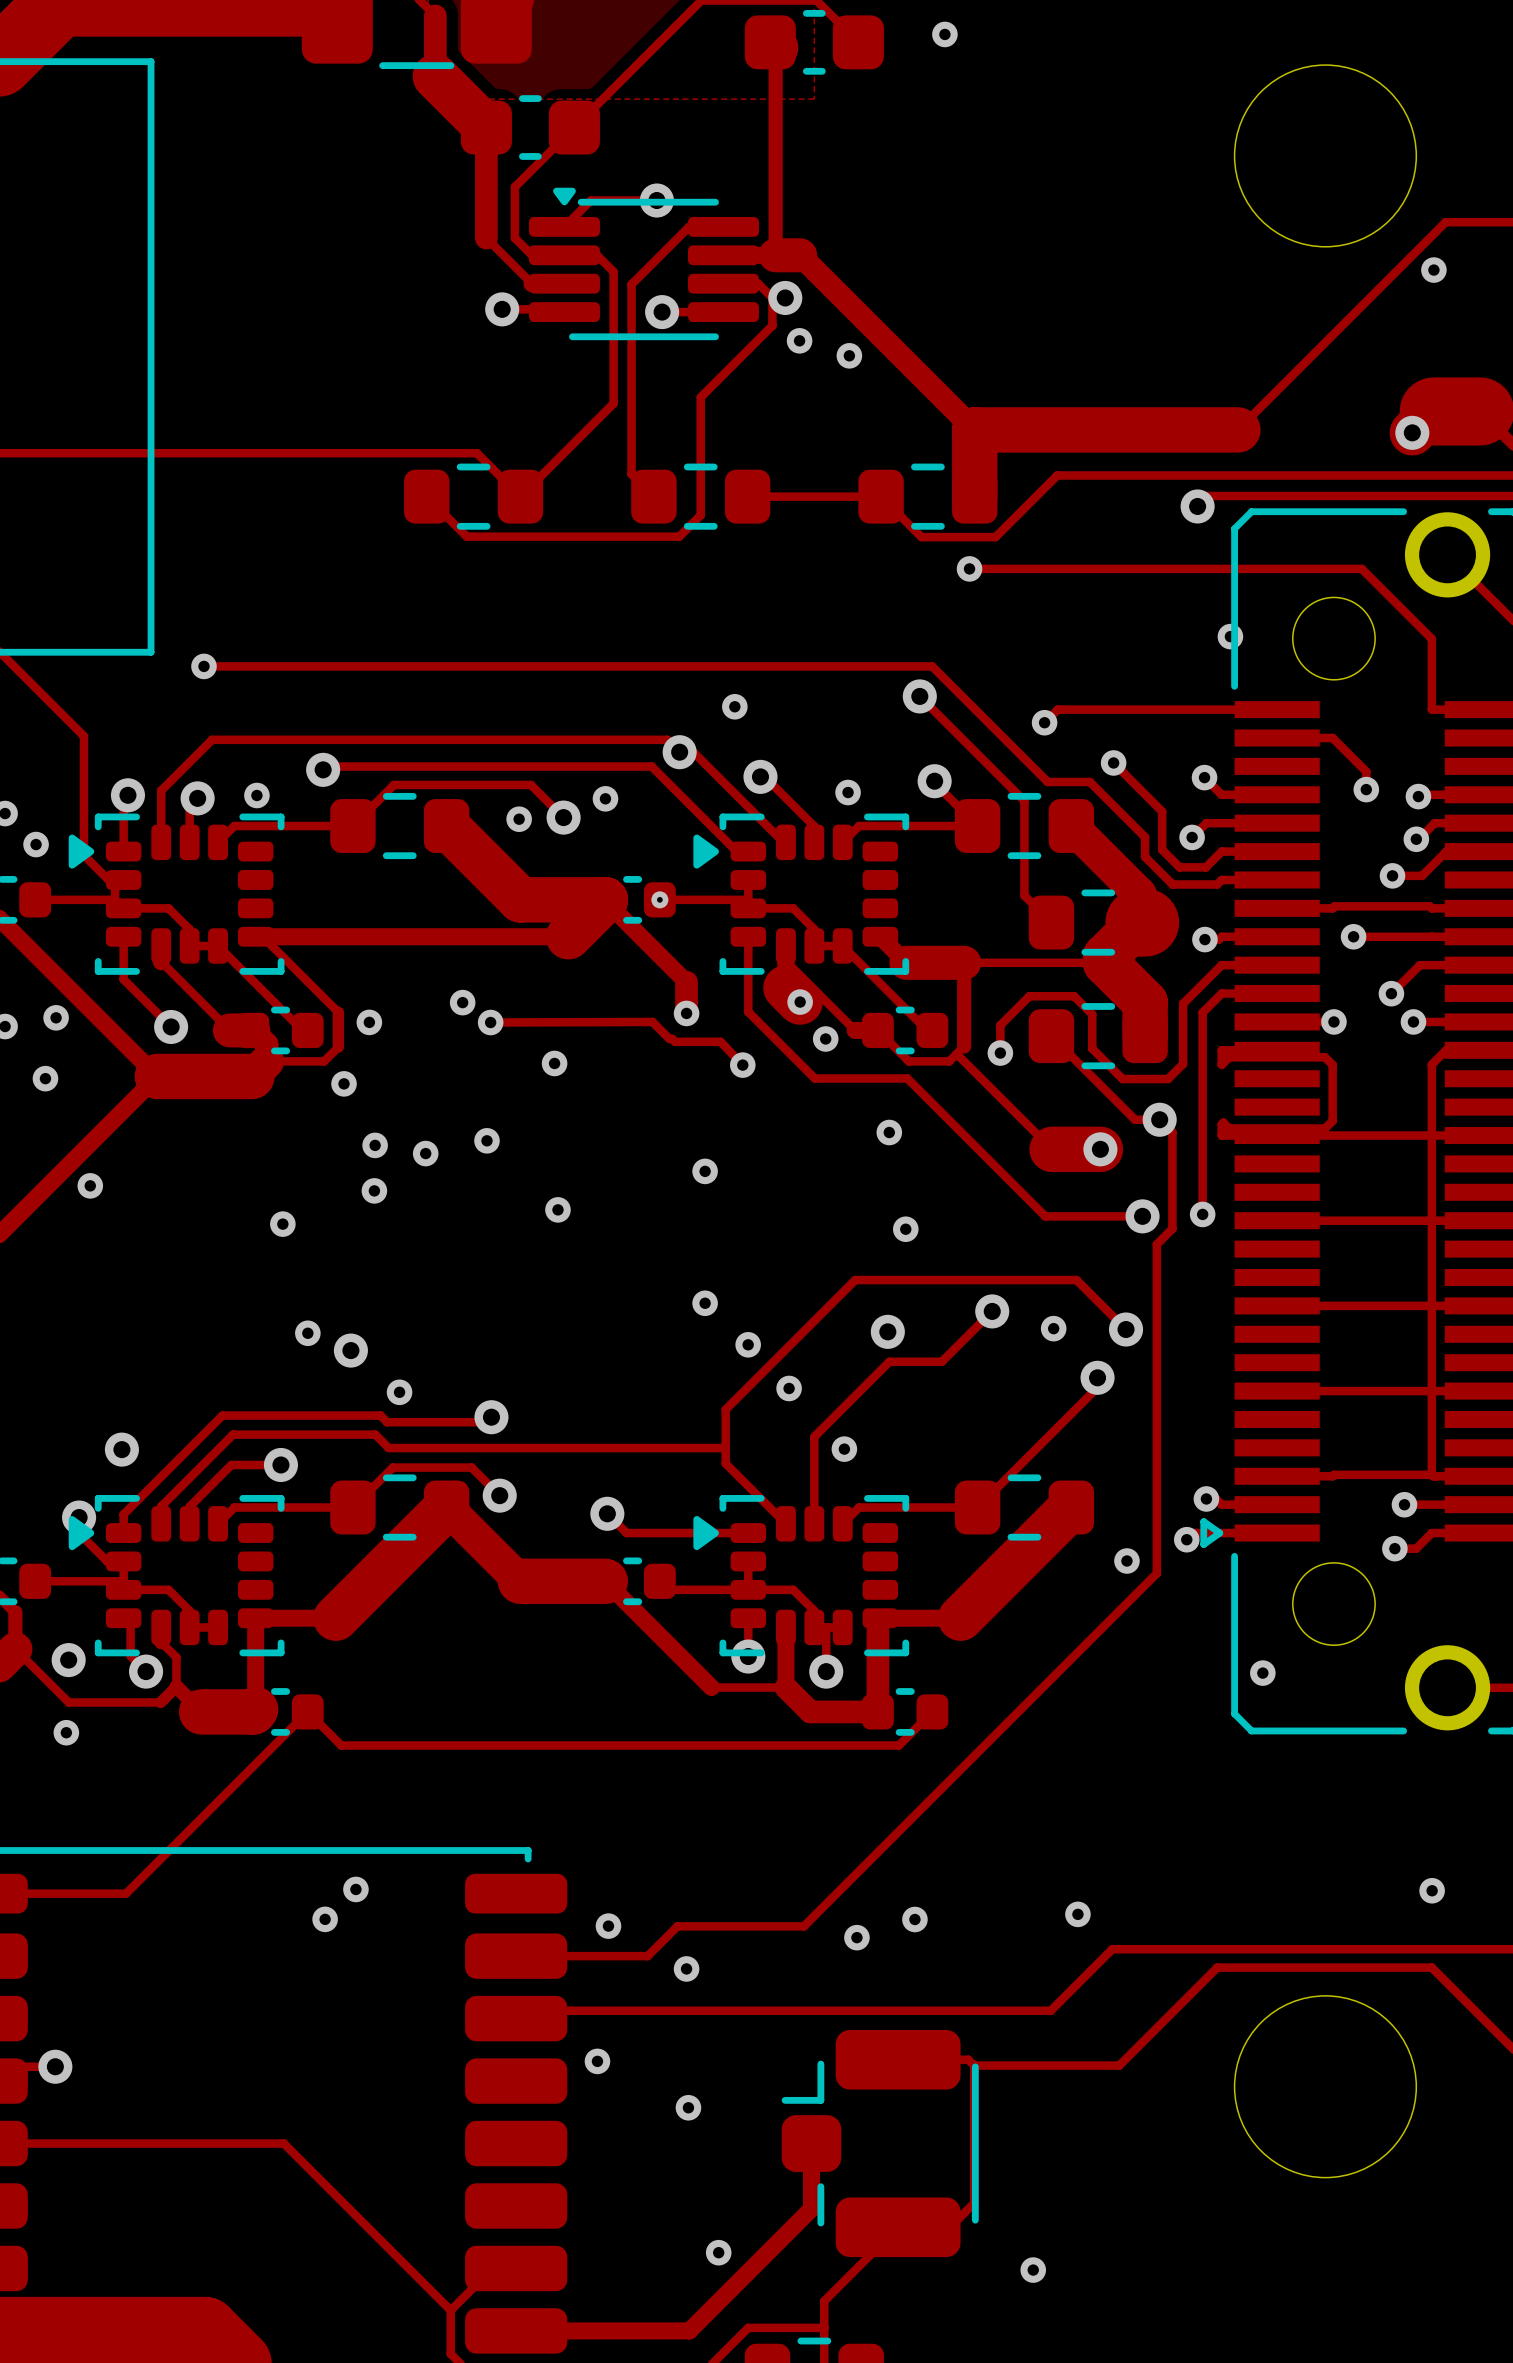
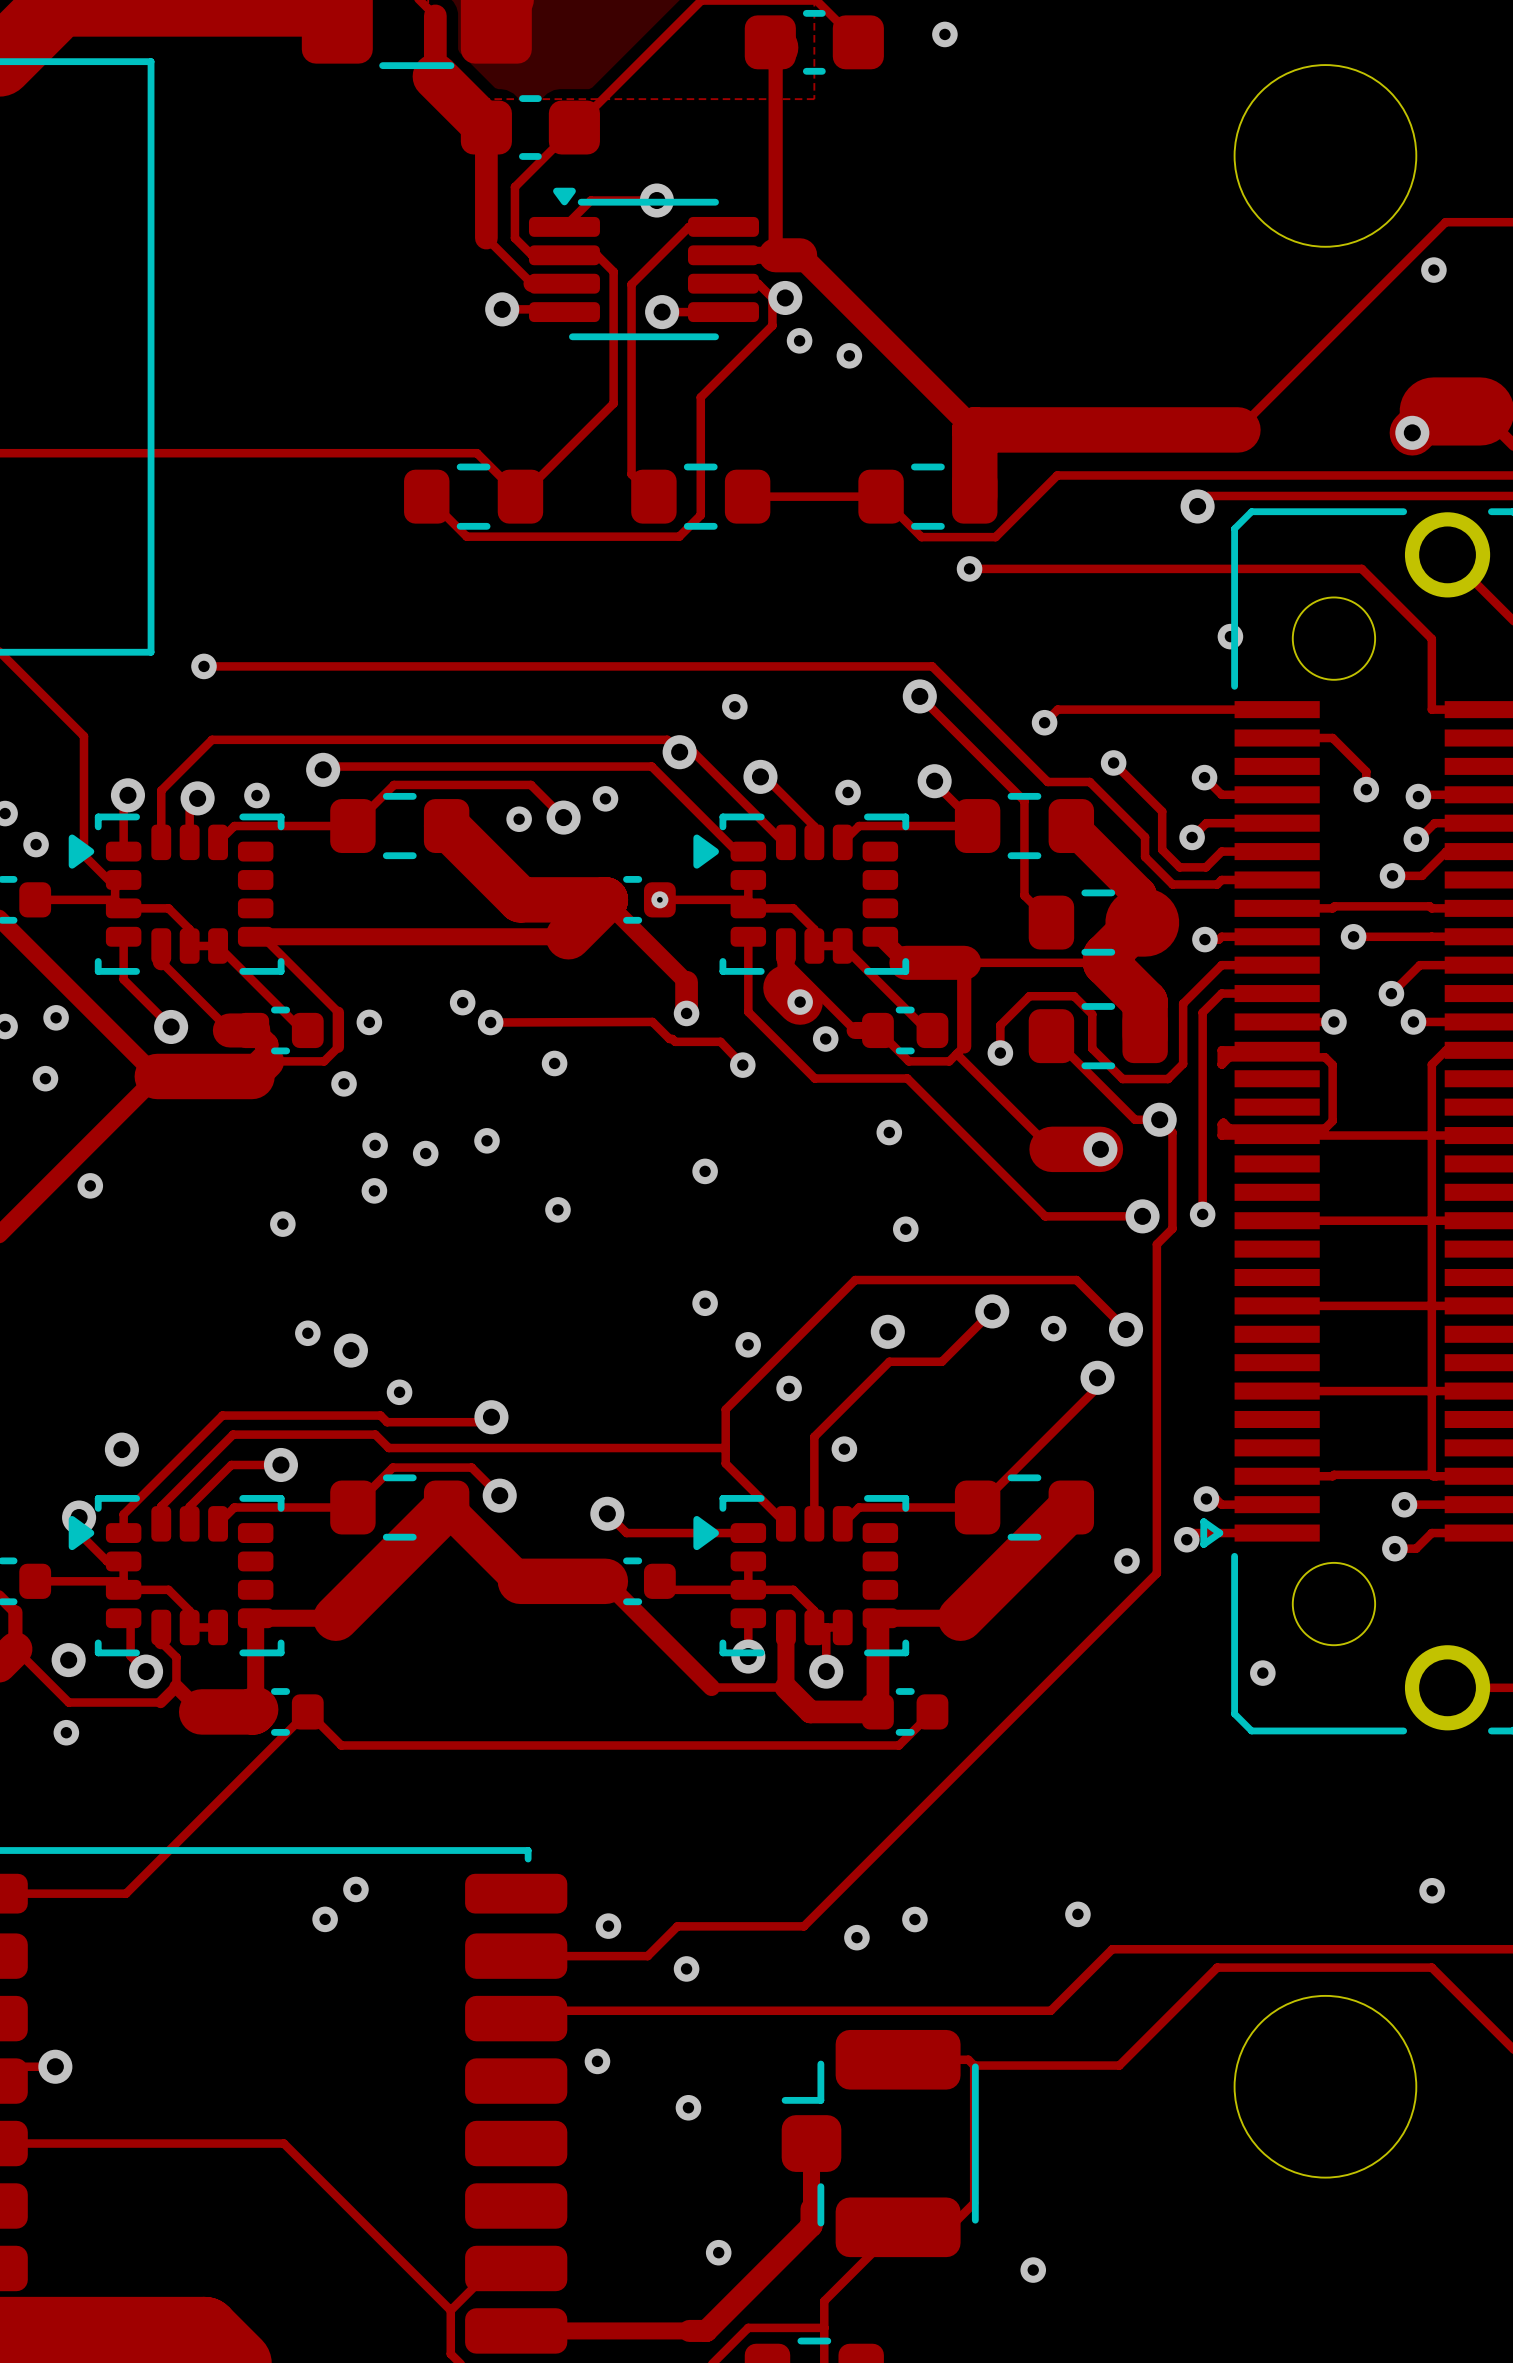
track: (811, 2208) (689, 2330) -> (811, 2208) (811, 2225) (706, 2330) (689, 2330)

